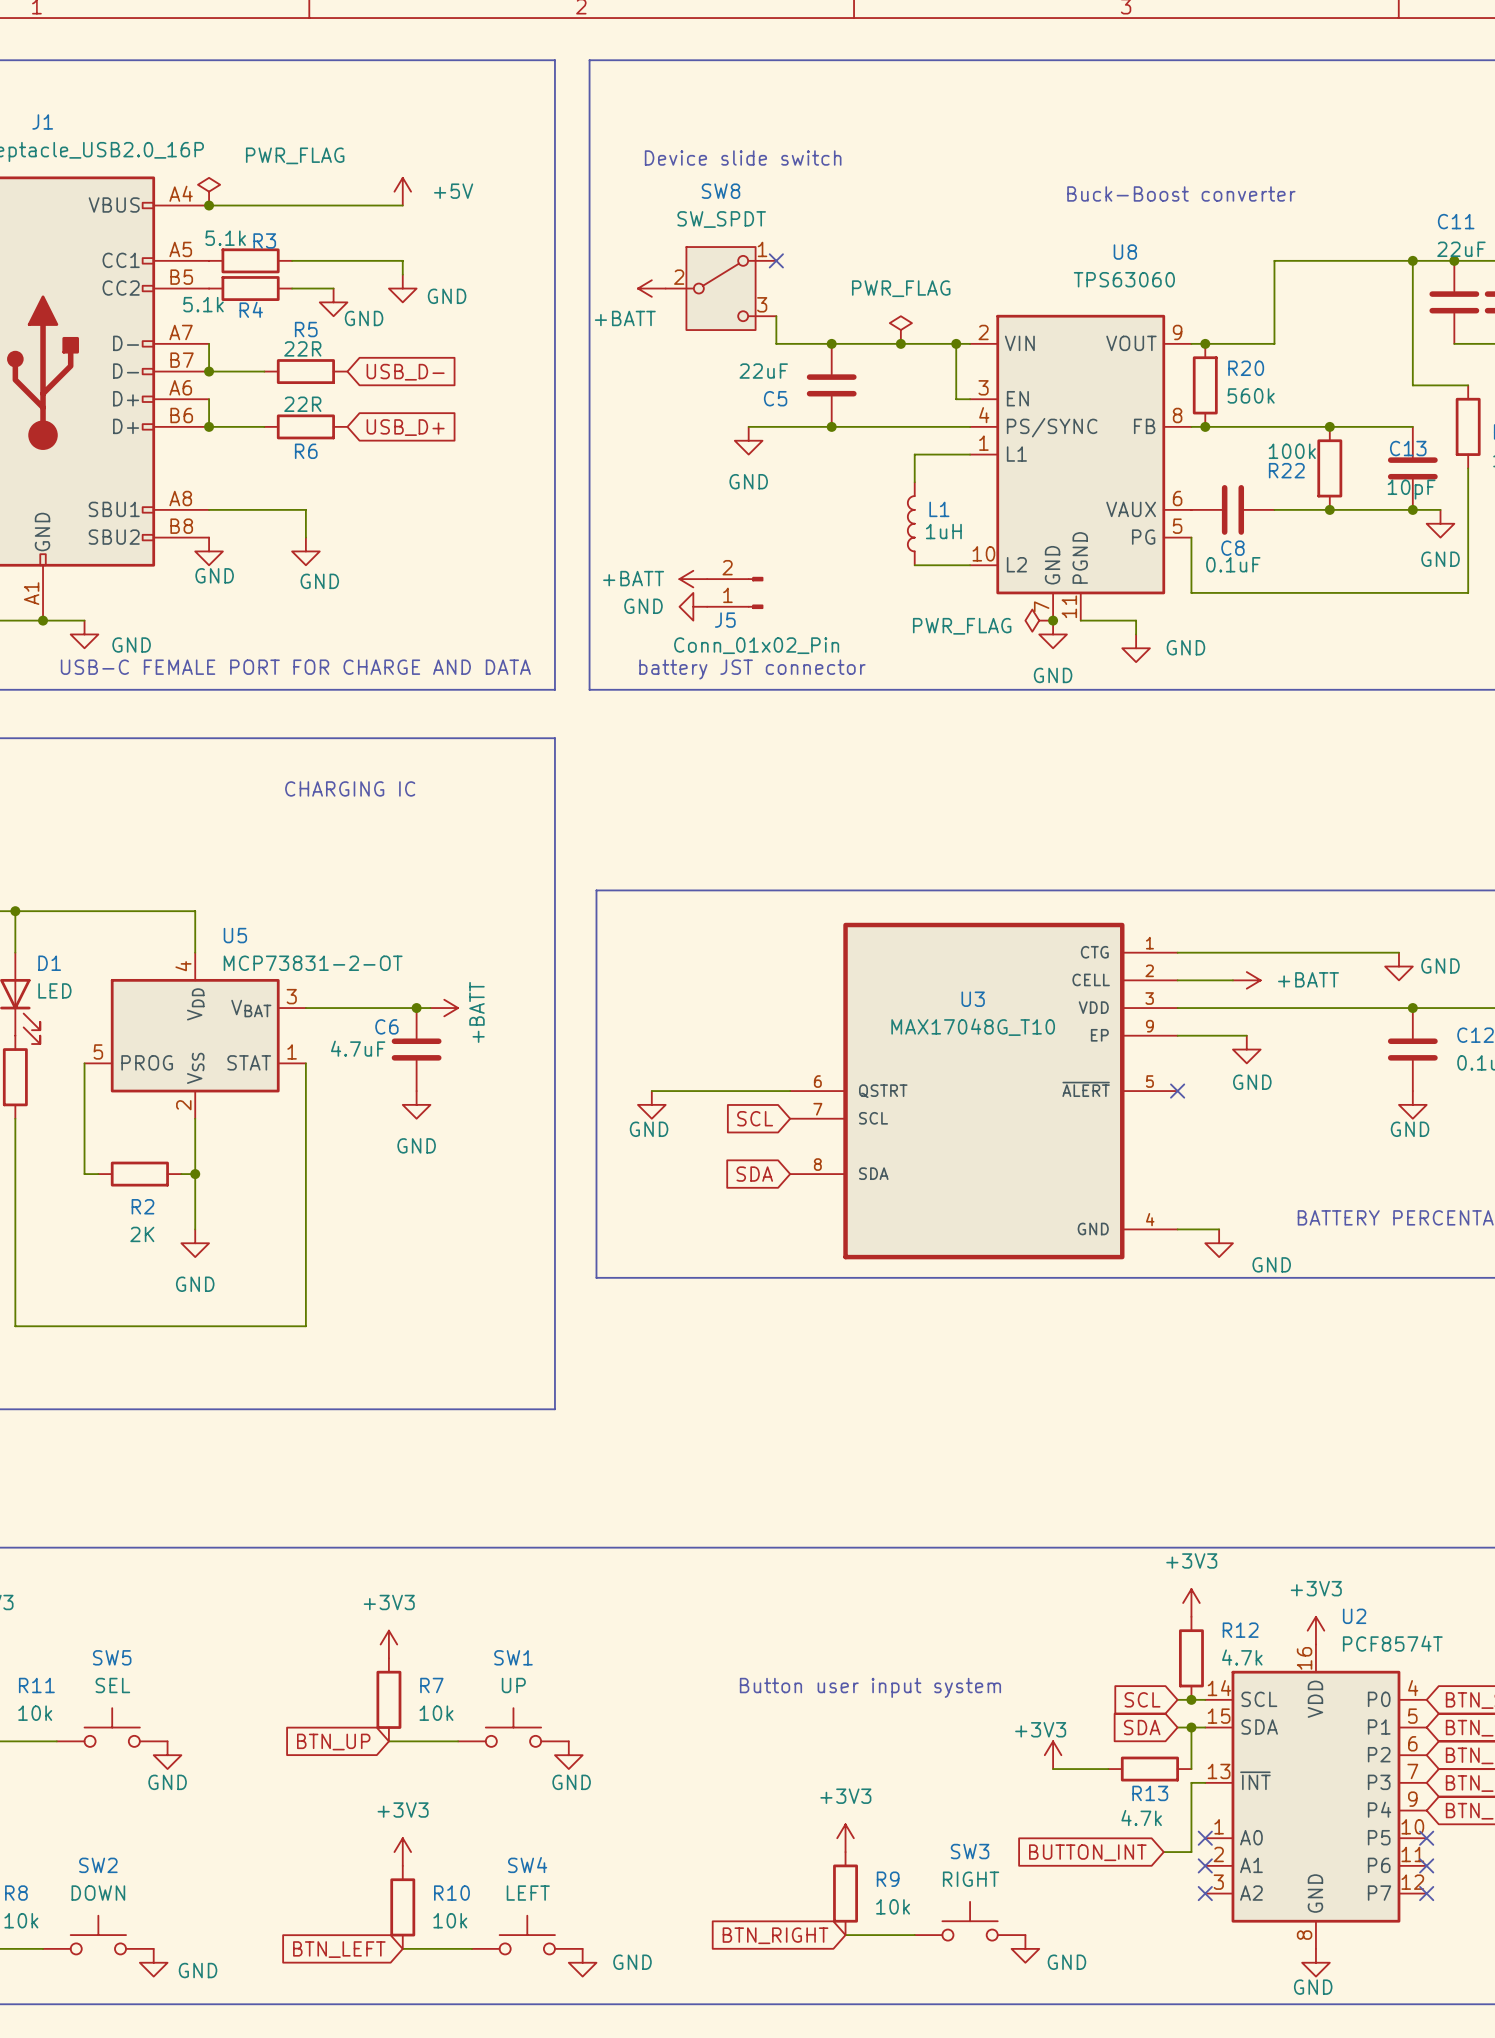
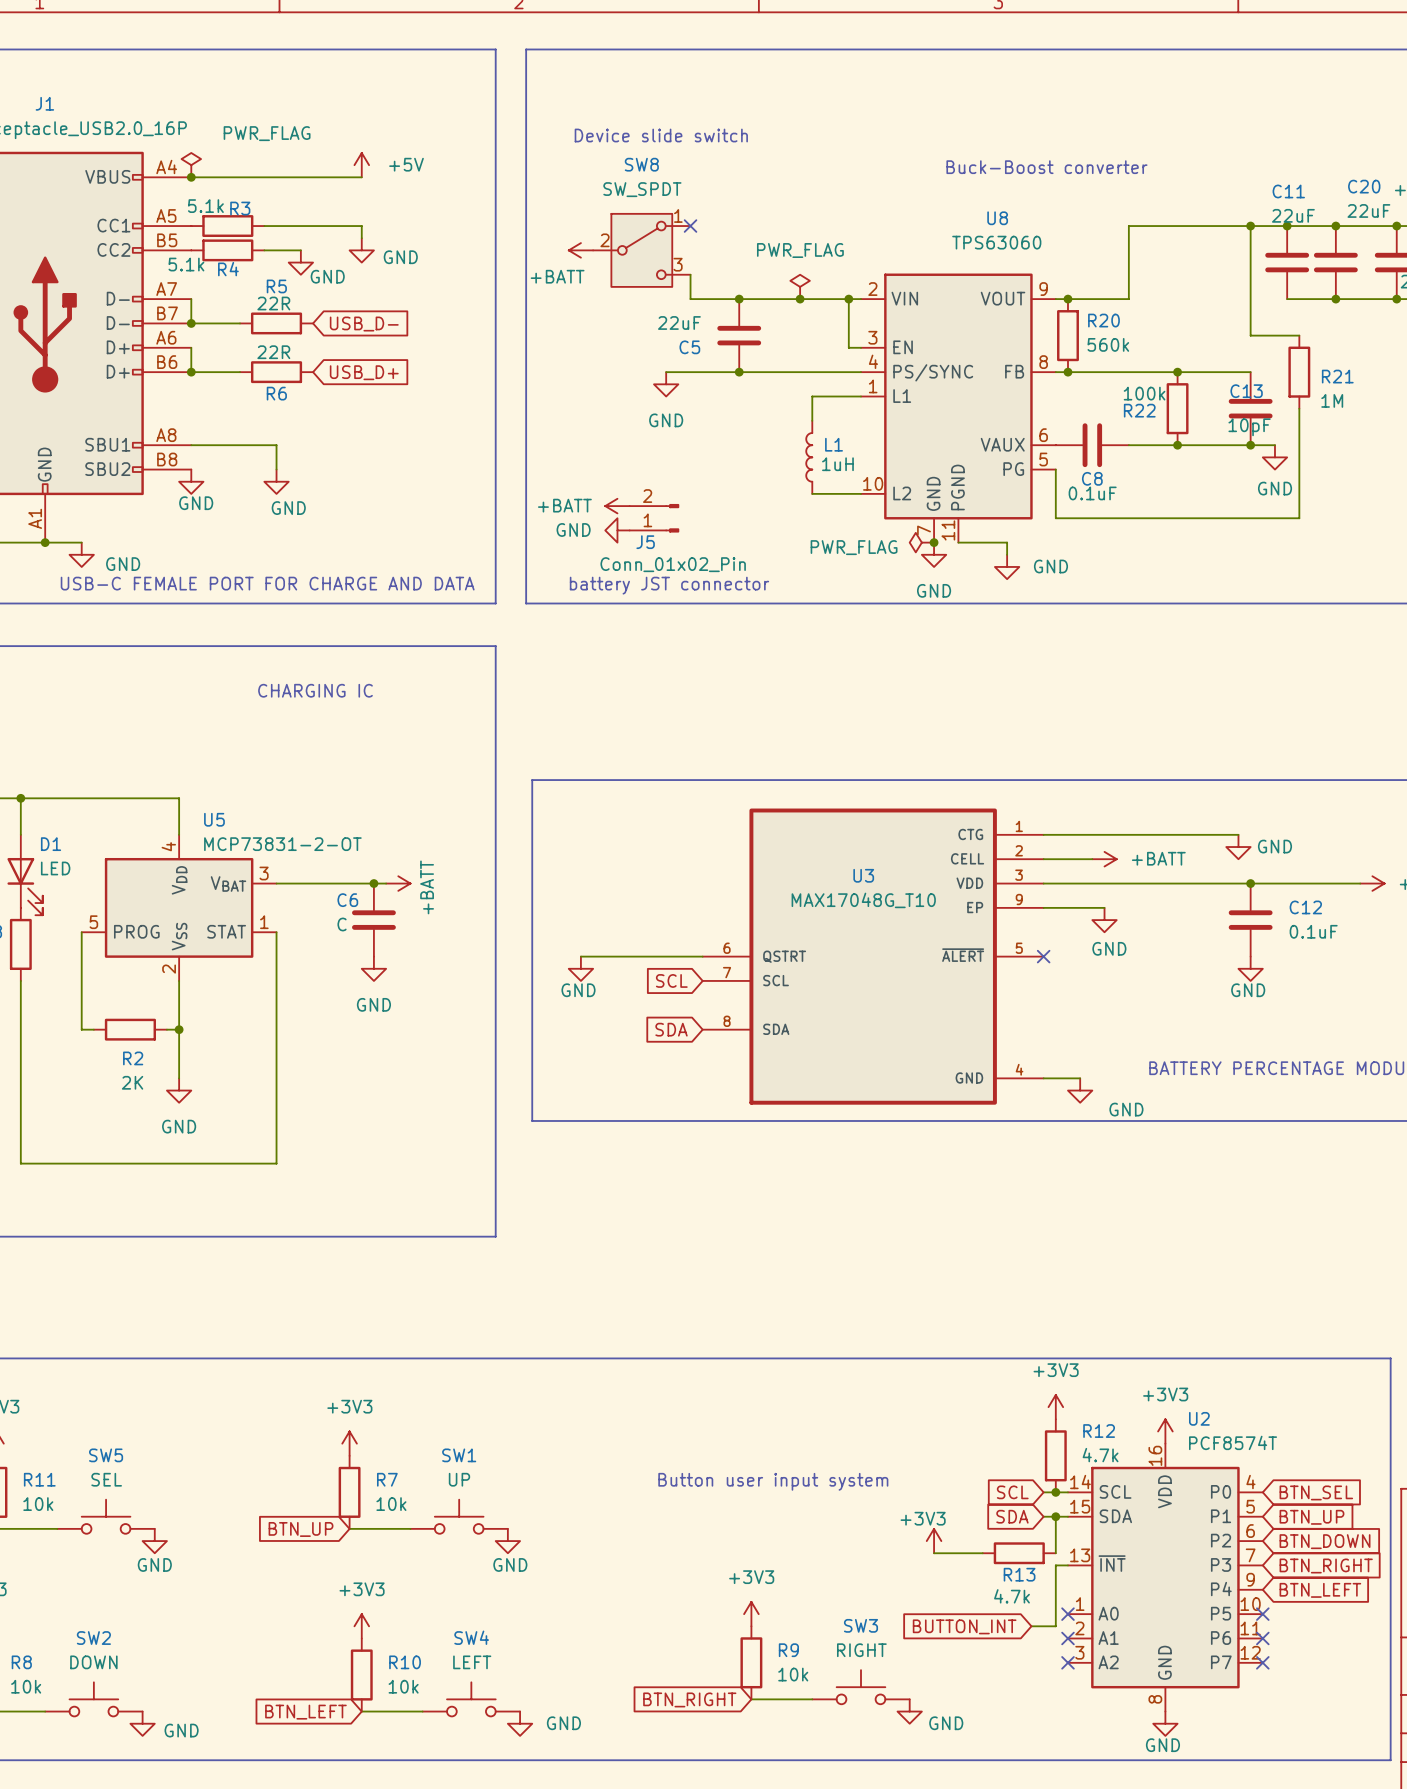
C6 value: 4.7uF (358, 1048) -> C (342, 924)

